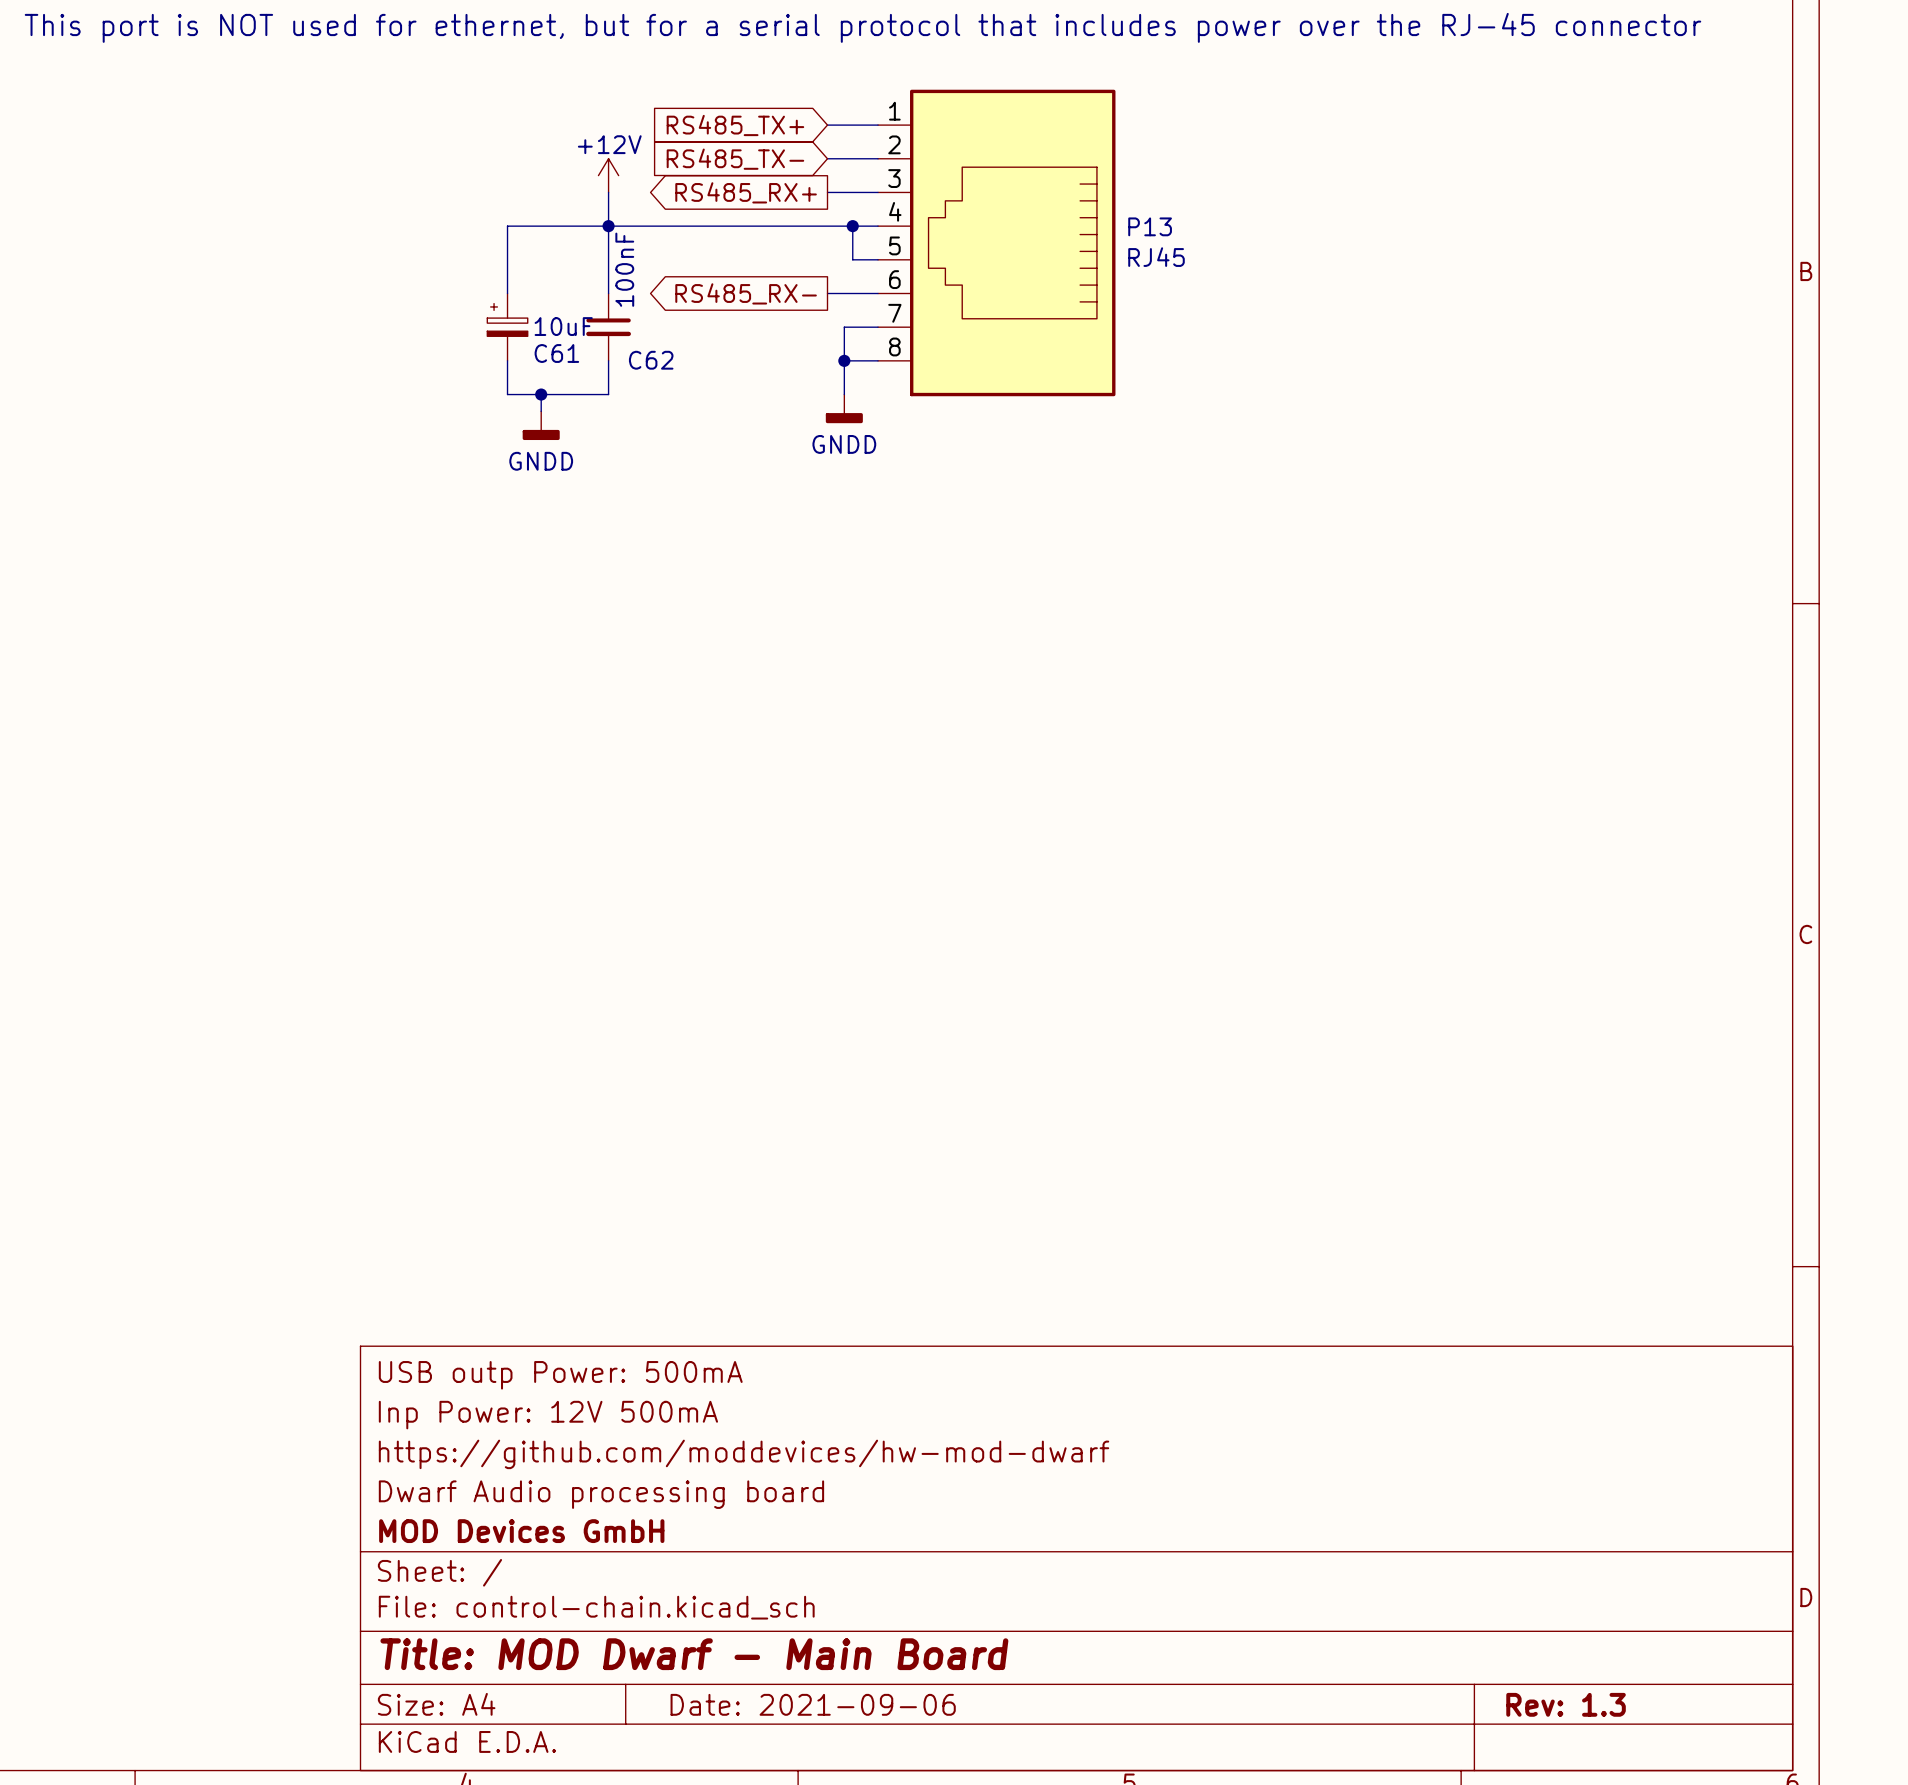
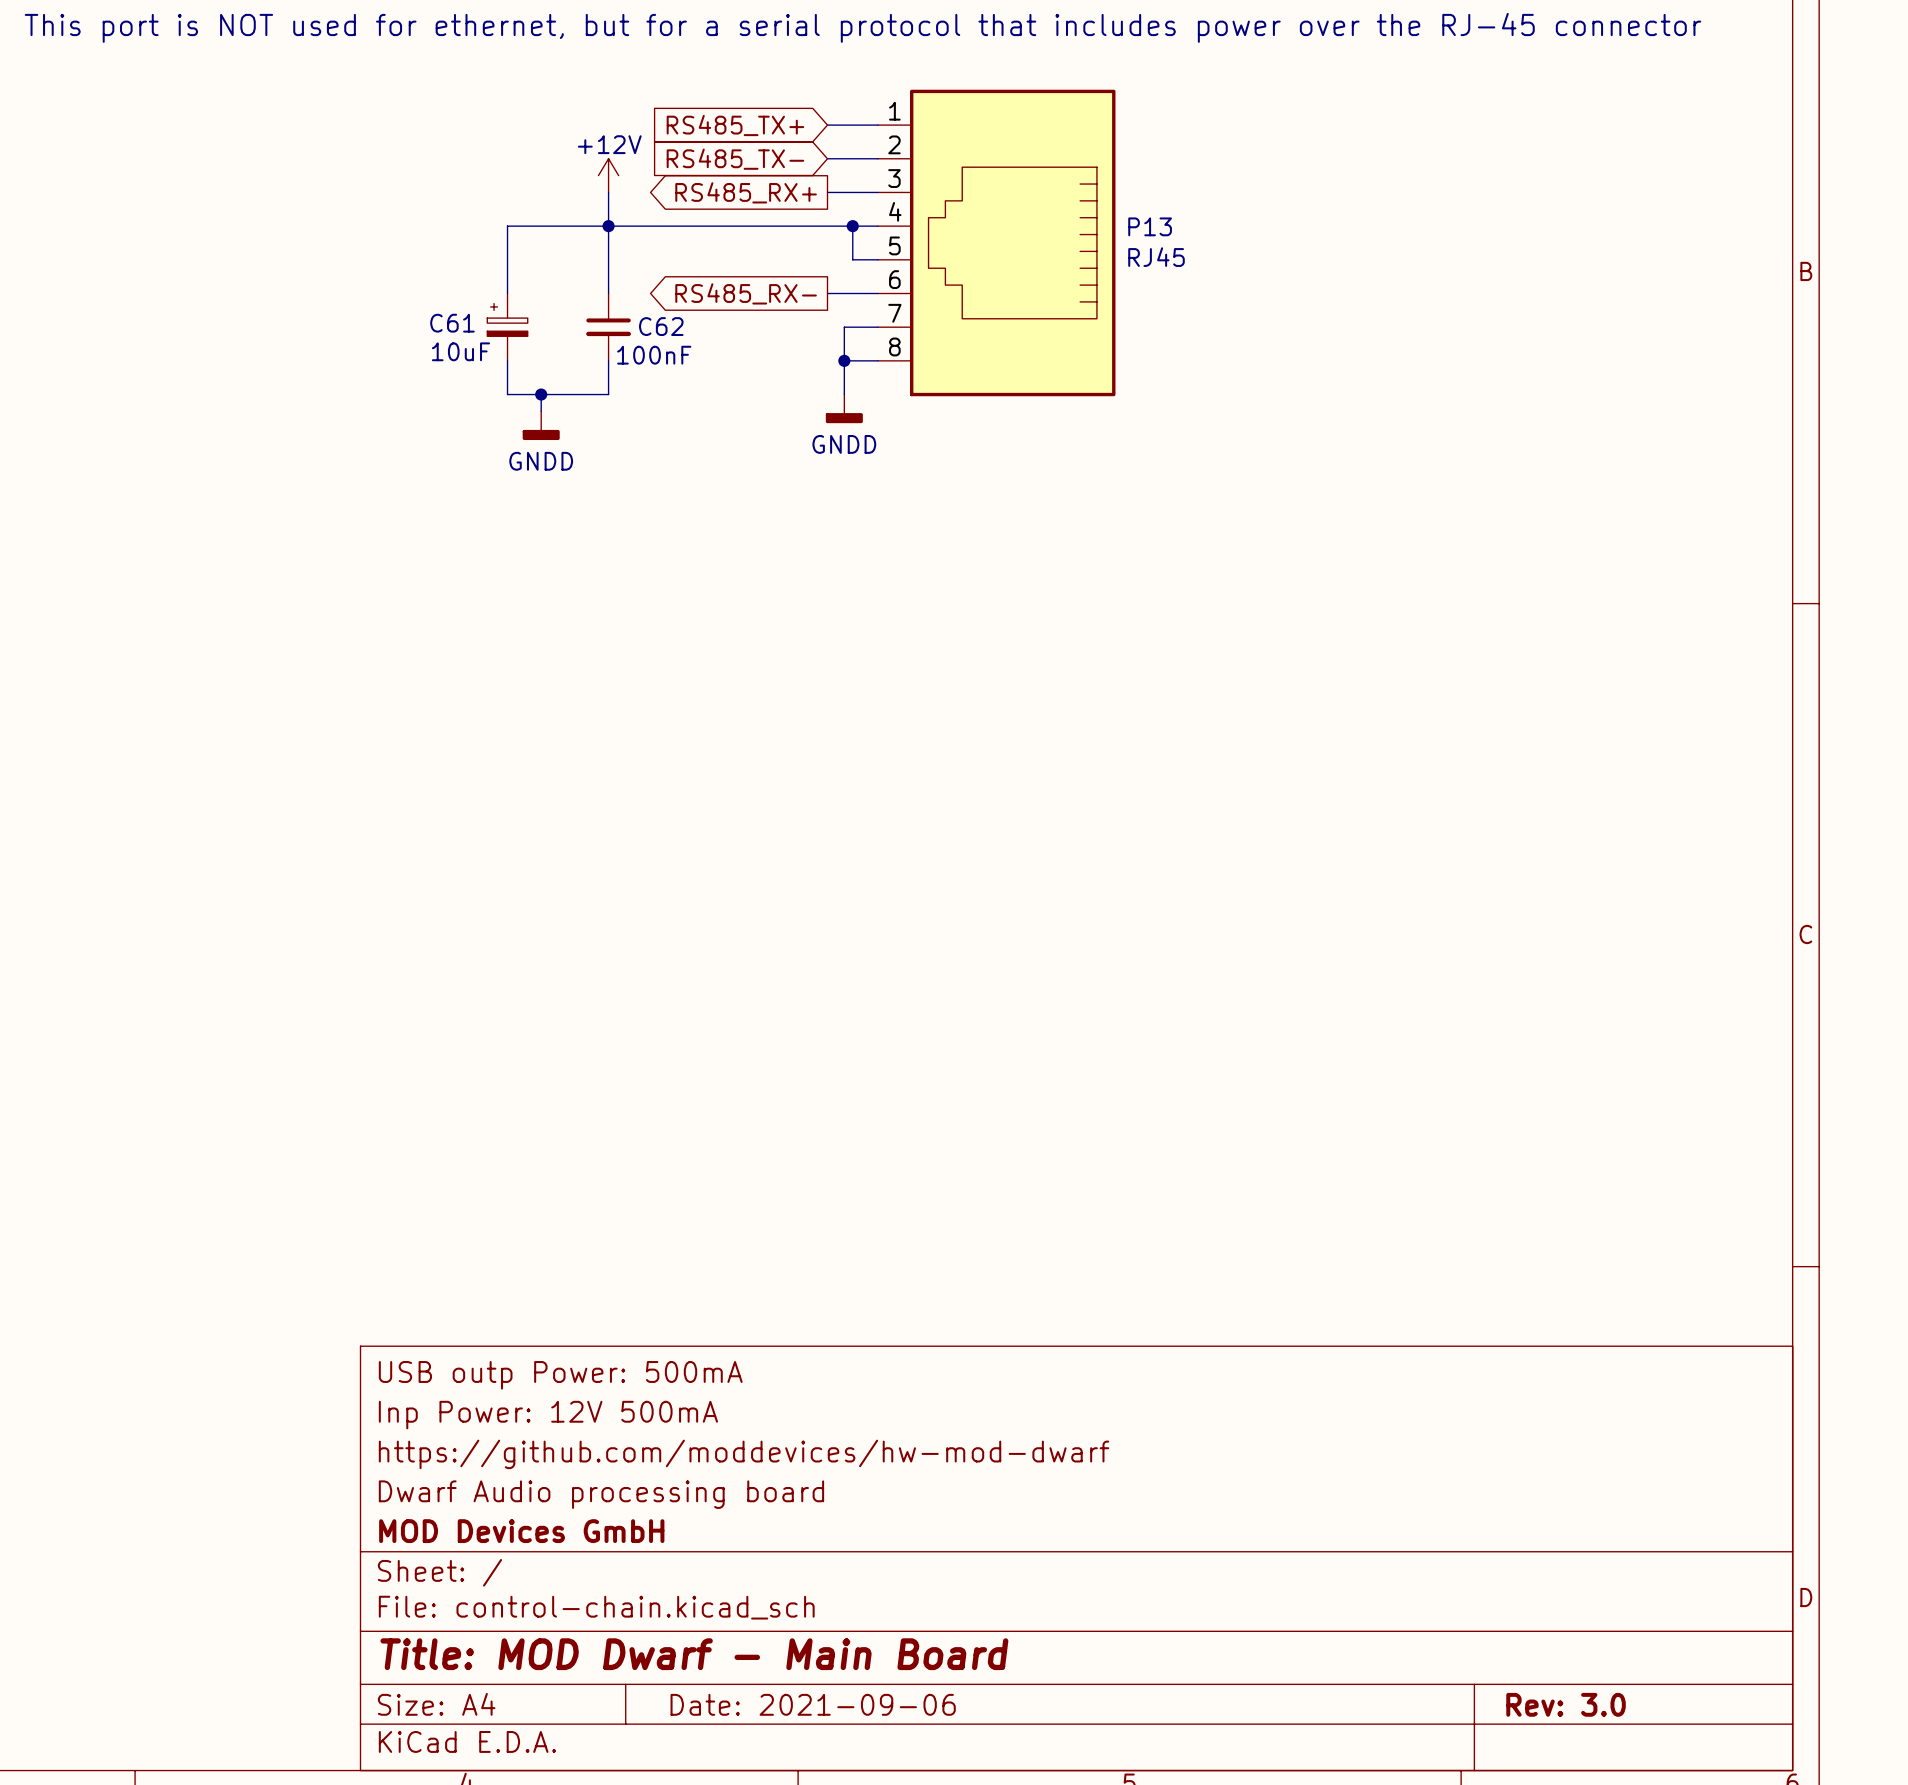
C62 value rotation: 0° (624, 269) -> 90° clockwise (654, 355)
C62 value position: 100nF (624, 269) -> 100nF (654, 355)
C61 value position: 10uF (563, 326) -> 10uF (460, 351)
C61 name position: C61 (556, 353) -> C61 (452, 323)
C62 name position: C62 (651, 360) -> C62 (661, 326)
title block: Rev: 1.3 (1566, 1704) -> Rev: 3.0 (1566, 1704)

